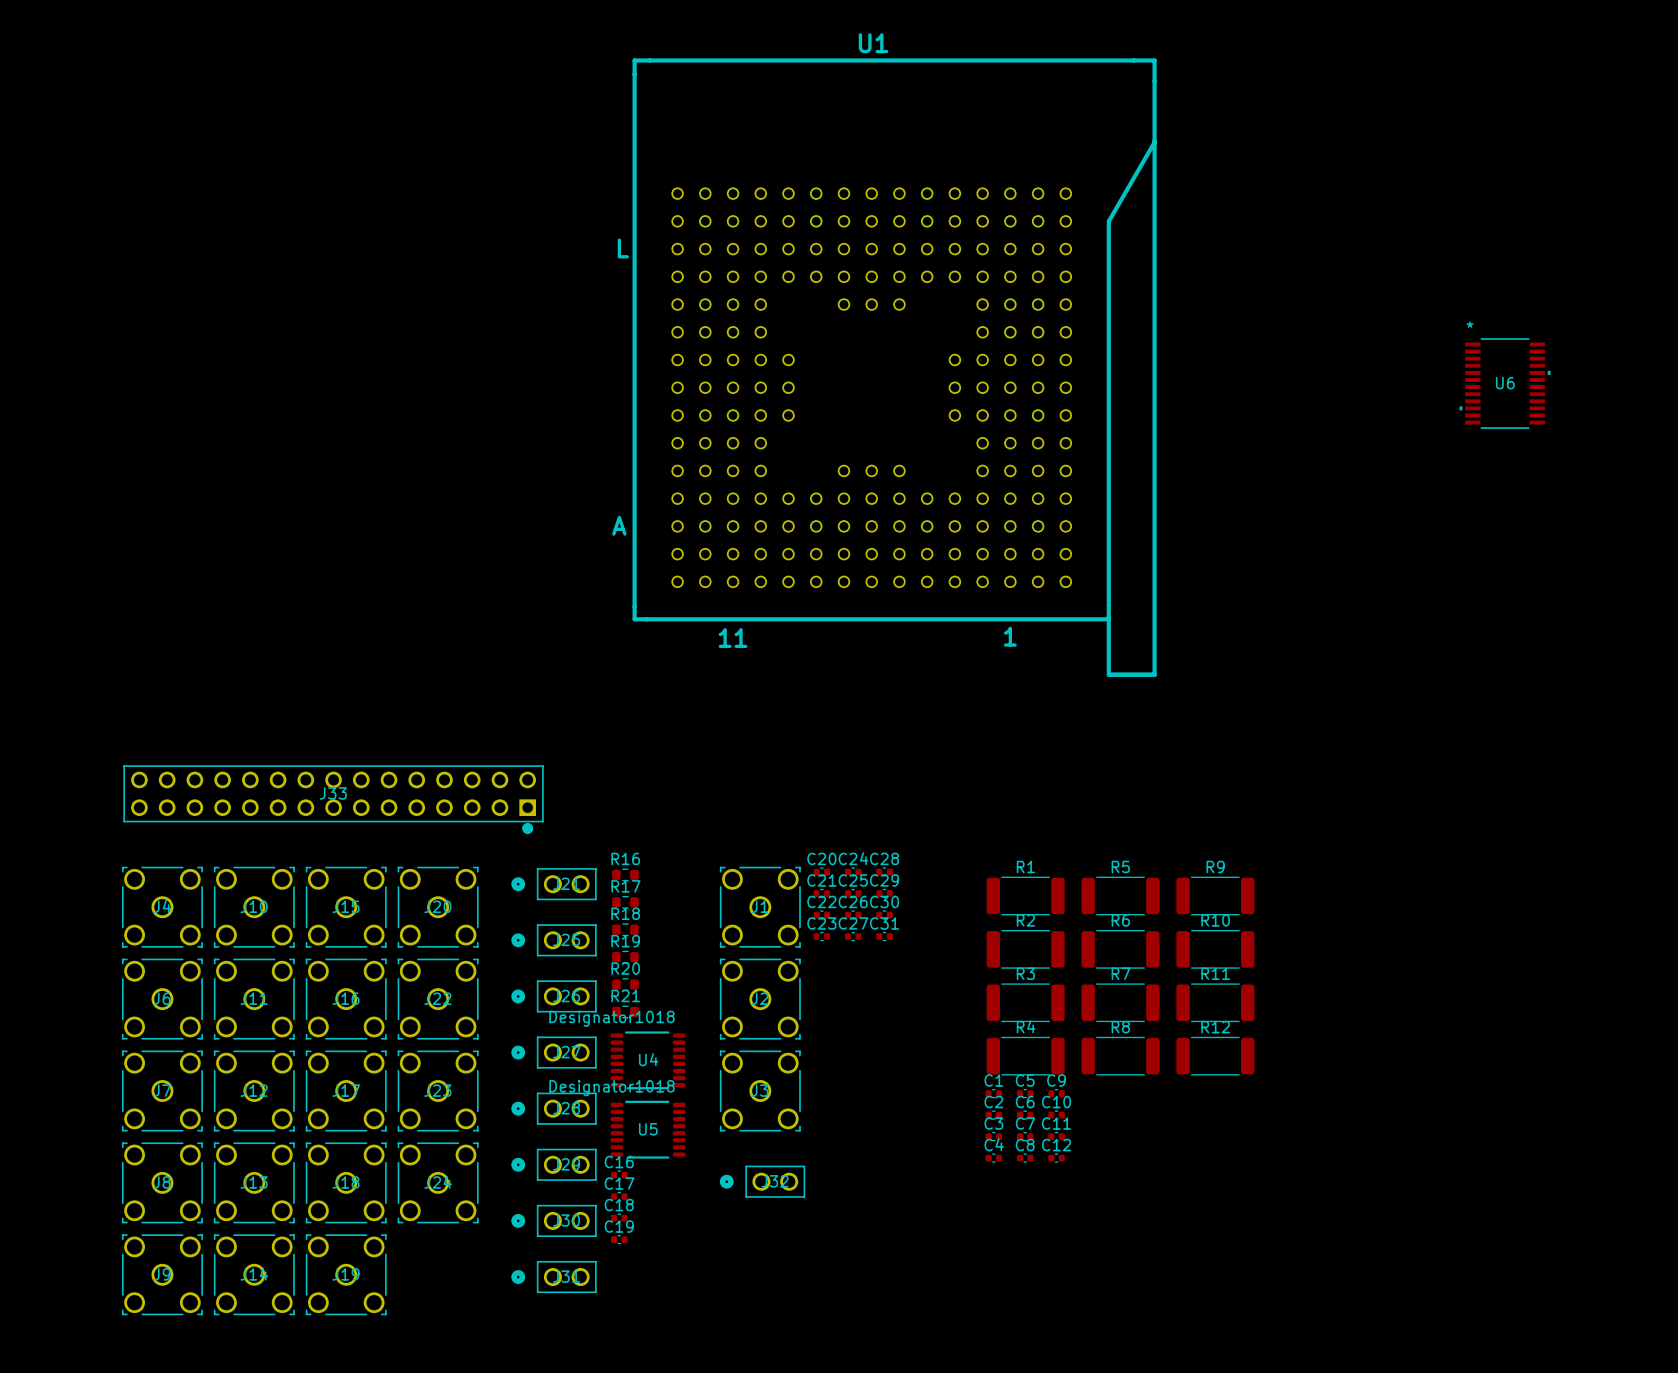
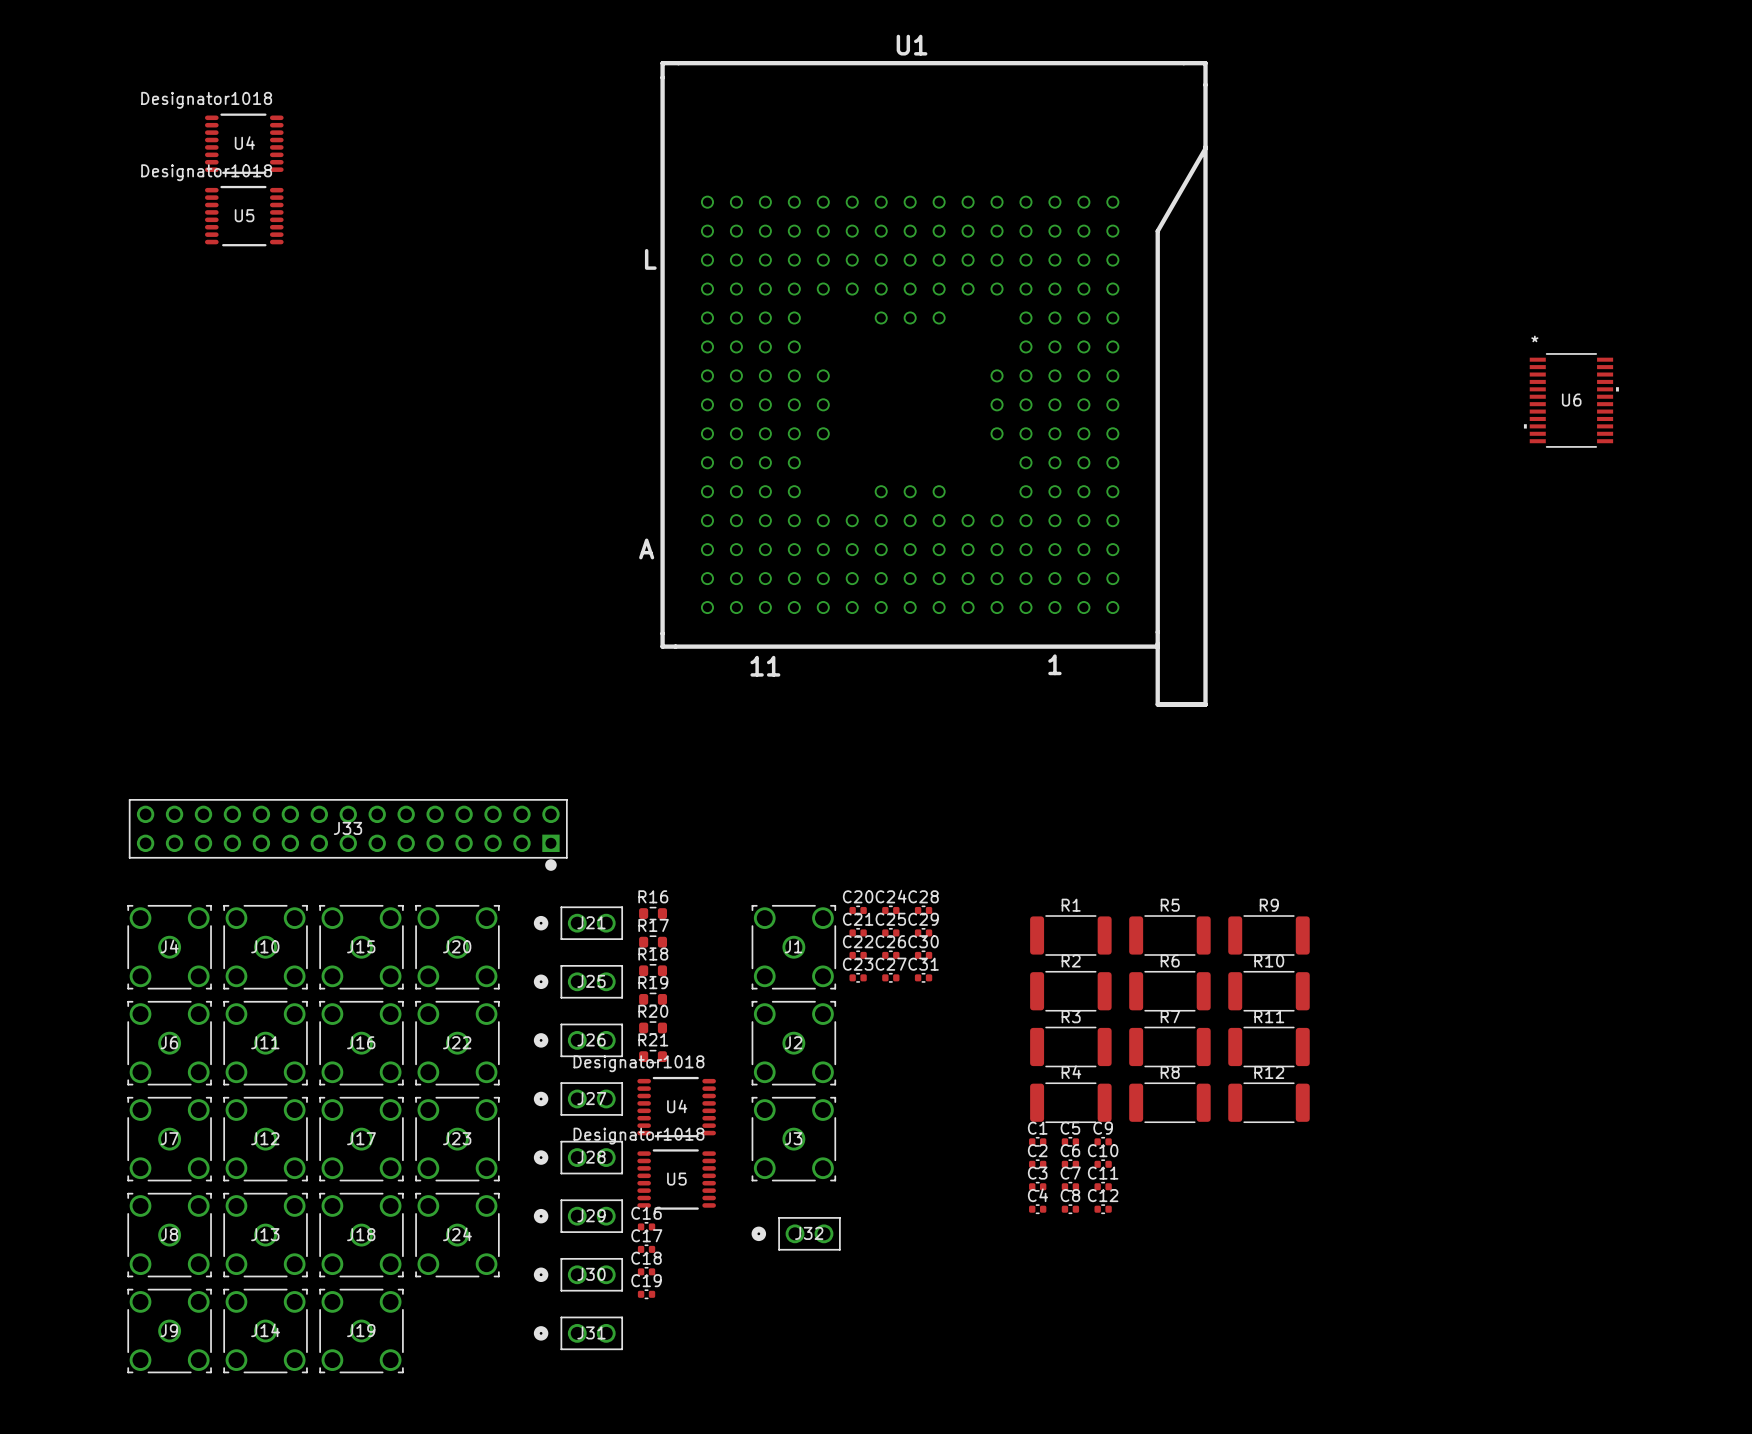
U4: none -> (244, 143)
U5: none -> (244, 216)

